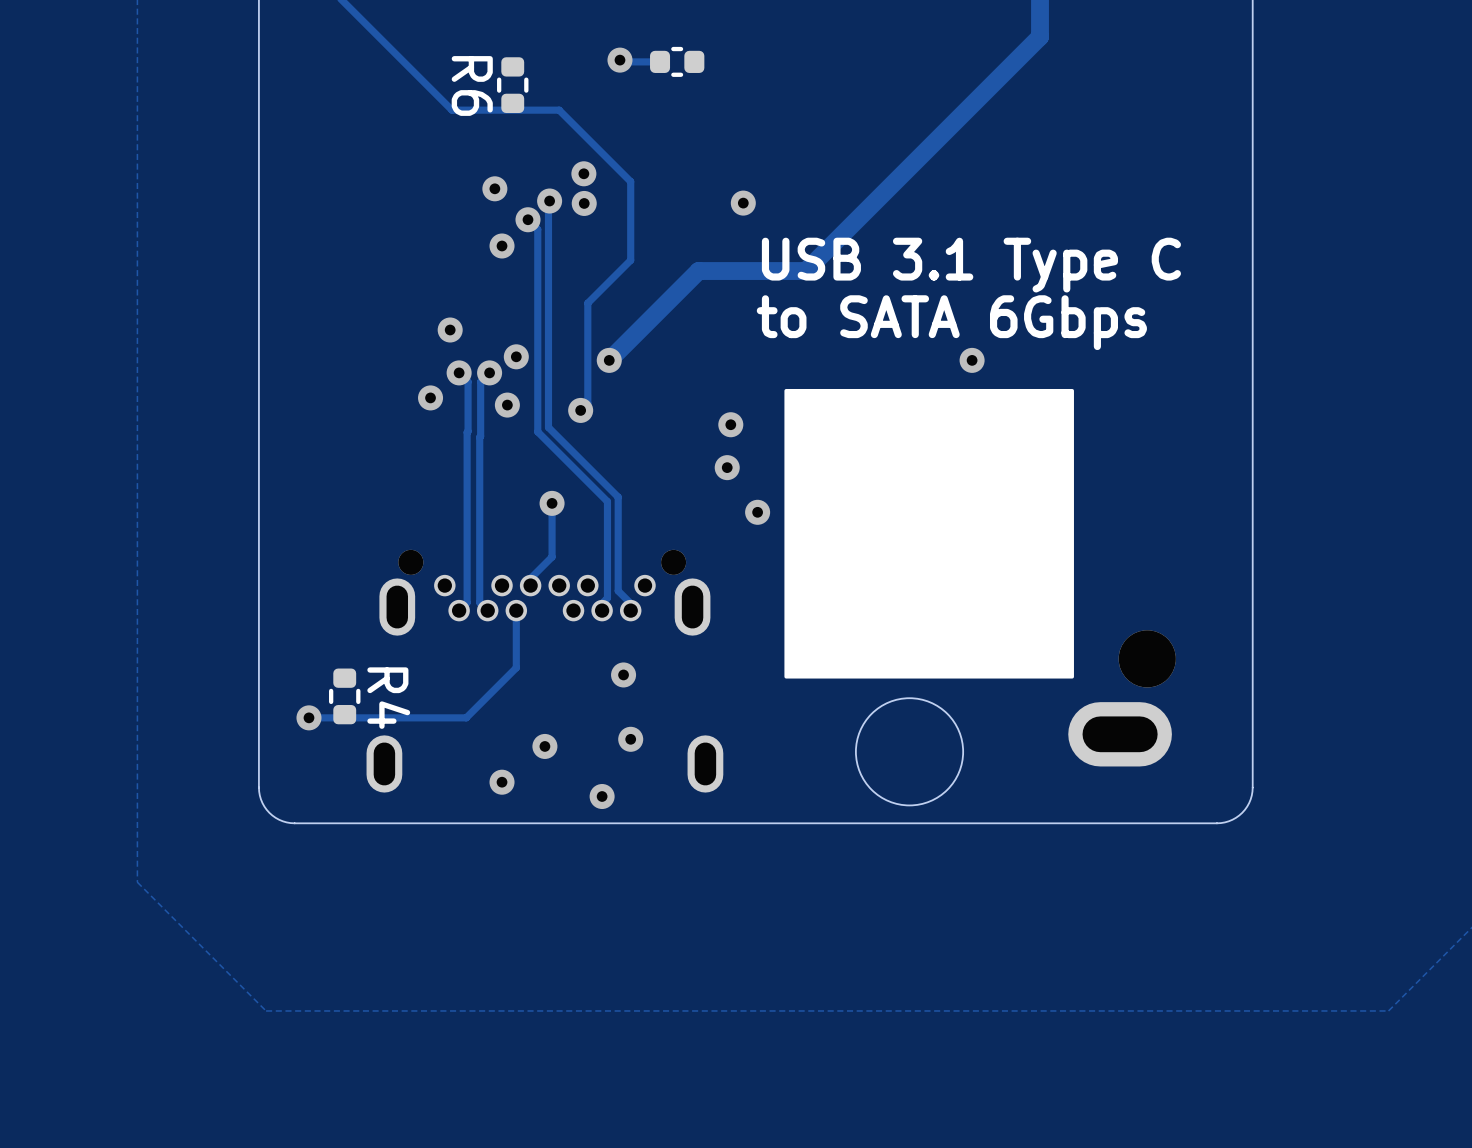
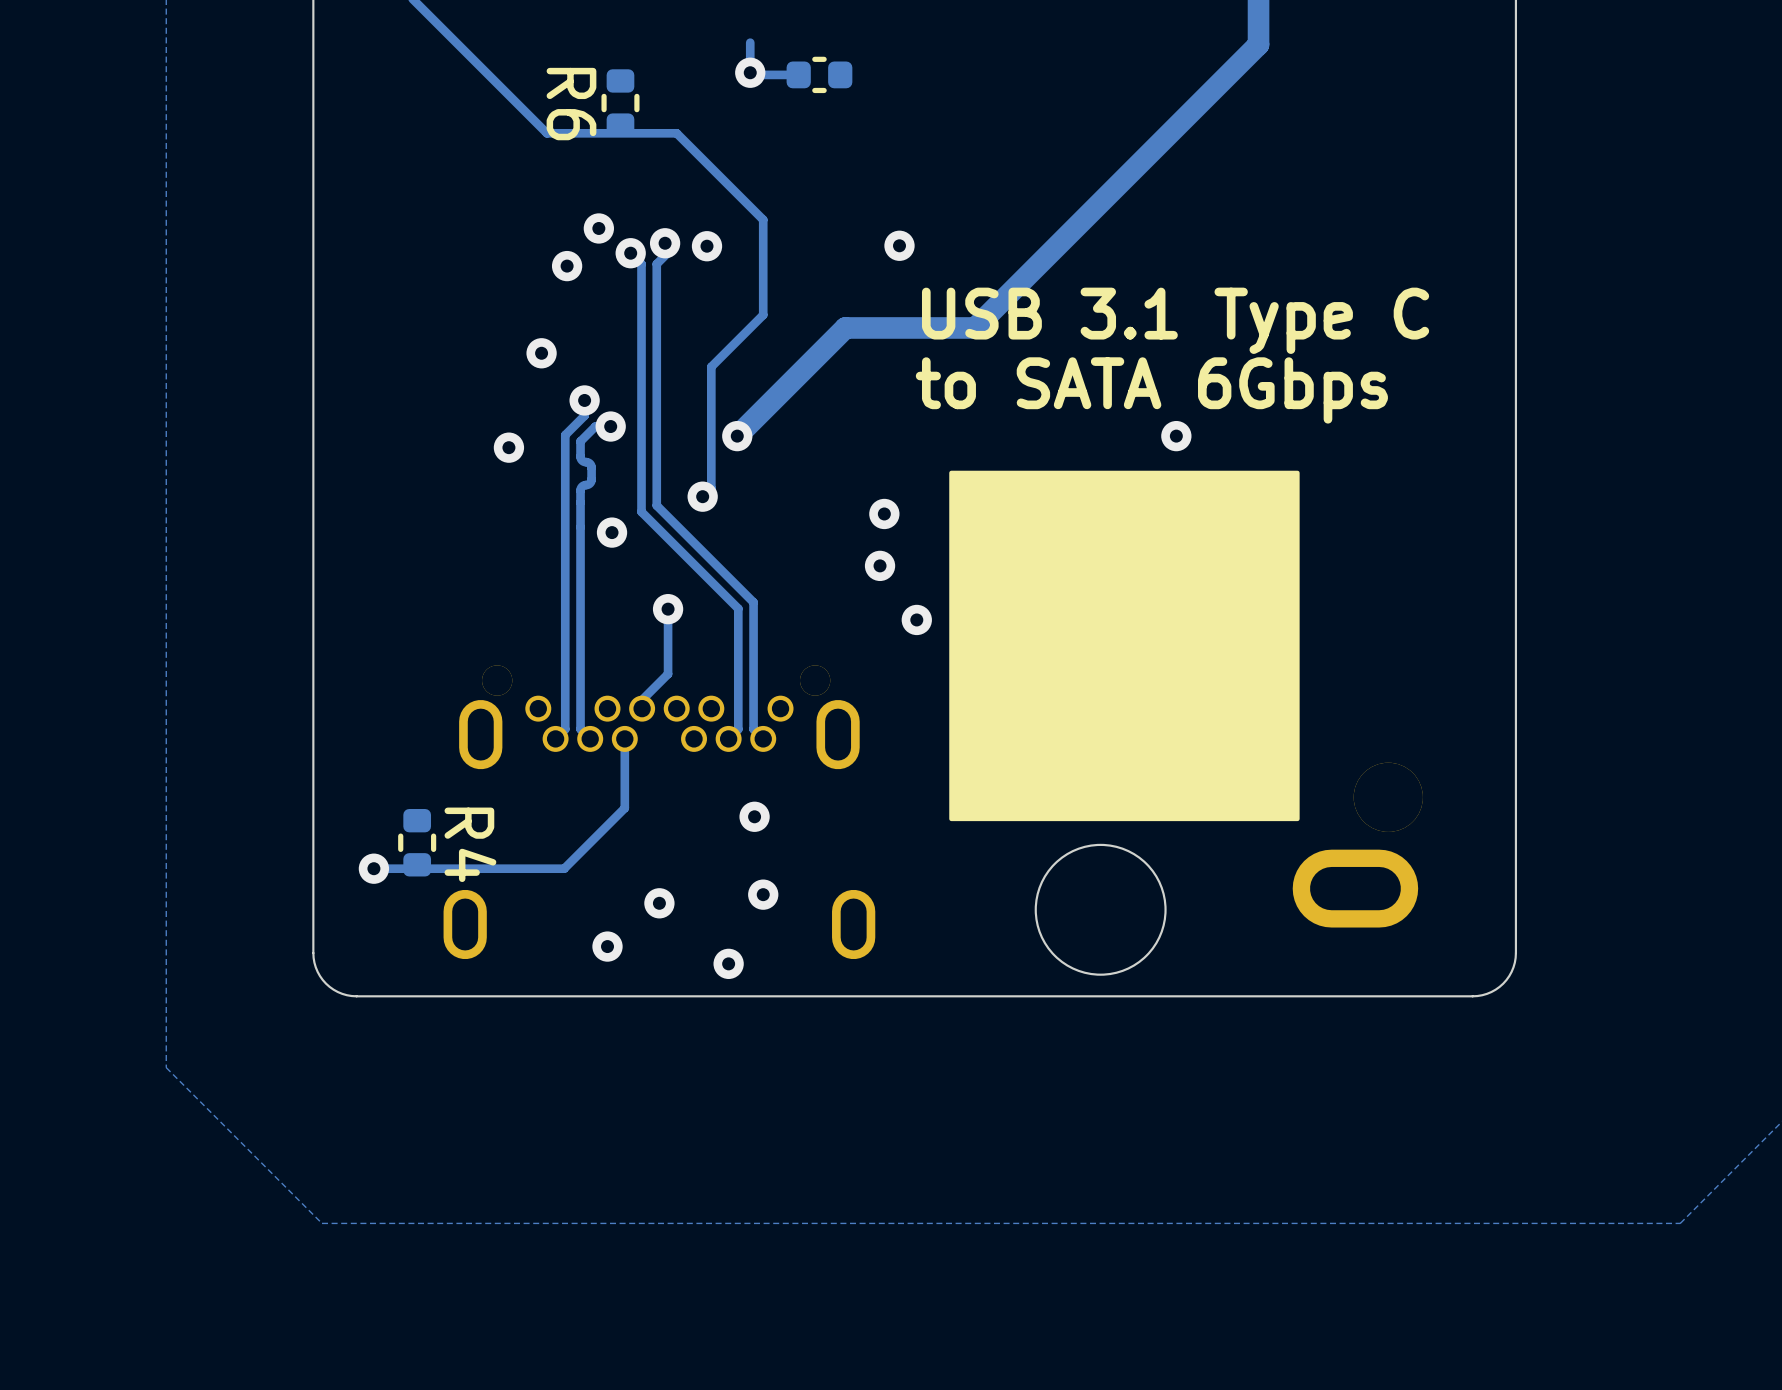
track: none -> (750, 42) (750, 72)
via: (583, 173) -> none
track: (549, 201) (548, 427) (618, 497) (618, 590) (630, 603) -> none
track: none -> (630, 253) (641, 264) (641, 511) (738, 608) (738, 729) (728, 738)
track: none -> (667, 253) (656, 264) (656, 505) (753, 602) (753, 729) (763, 738)
via: none -> (567, 266)
track: (527, 219) (537, 229) (537, 431) (607, 501) (607, 598) (602, 603) -> none
via position: (527, 219) -> (630, 253)
via: (502, 246) -> none
via: none -> (541, 353)
via: (450, 330) -> none
via: none -> (584, 400)
via: none -> (610, 426)
via: (516, 356) -> none
via: none -> (508, 447)
track: (459, 372) (468, 381) (467, 432) -> (584, 400) (584, 415) (565, 435) (565, 523)
via: (459, 372) -> none
track: (489, 372) (480, 381) (479, 437) -> (610, 426) (595, 426) (580, 441) (580, 458) (589, 463) (591, 467) (590, 482) (582, 486) (580, 489) (580, 529)
via: (489, 372) -> none
via: (430, 397) -> none
via: (507, 405) -> none
via: none -> (612, 532)

